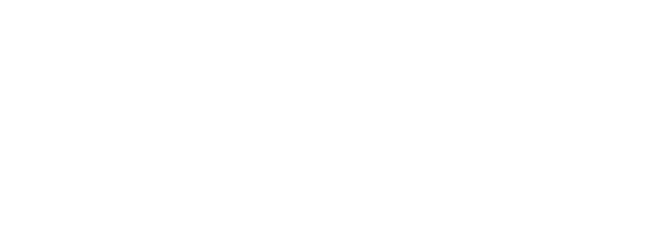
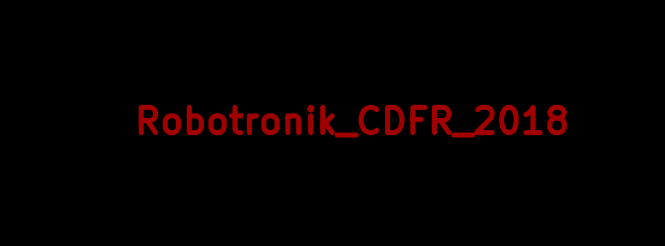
text: none -> Robotronik_CDFR_2018 (352, 121)

